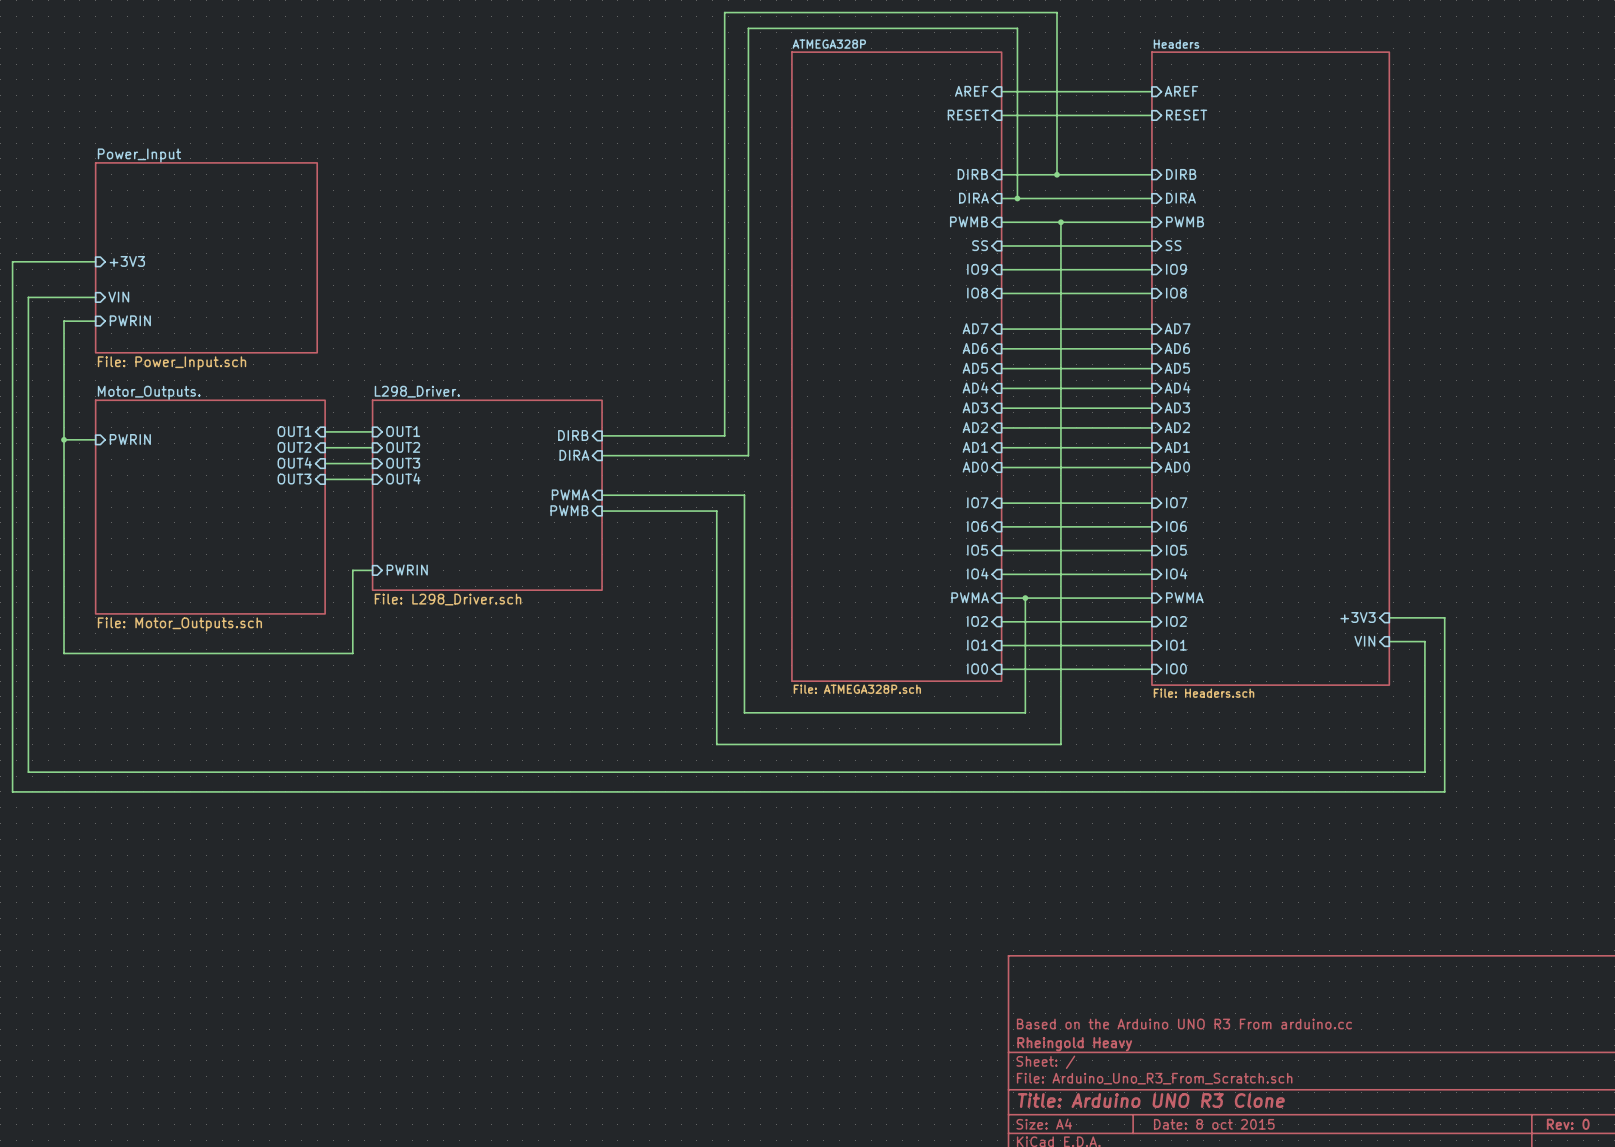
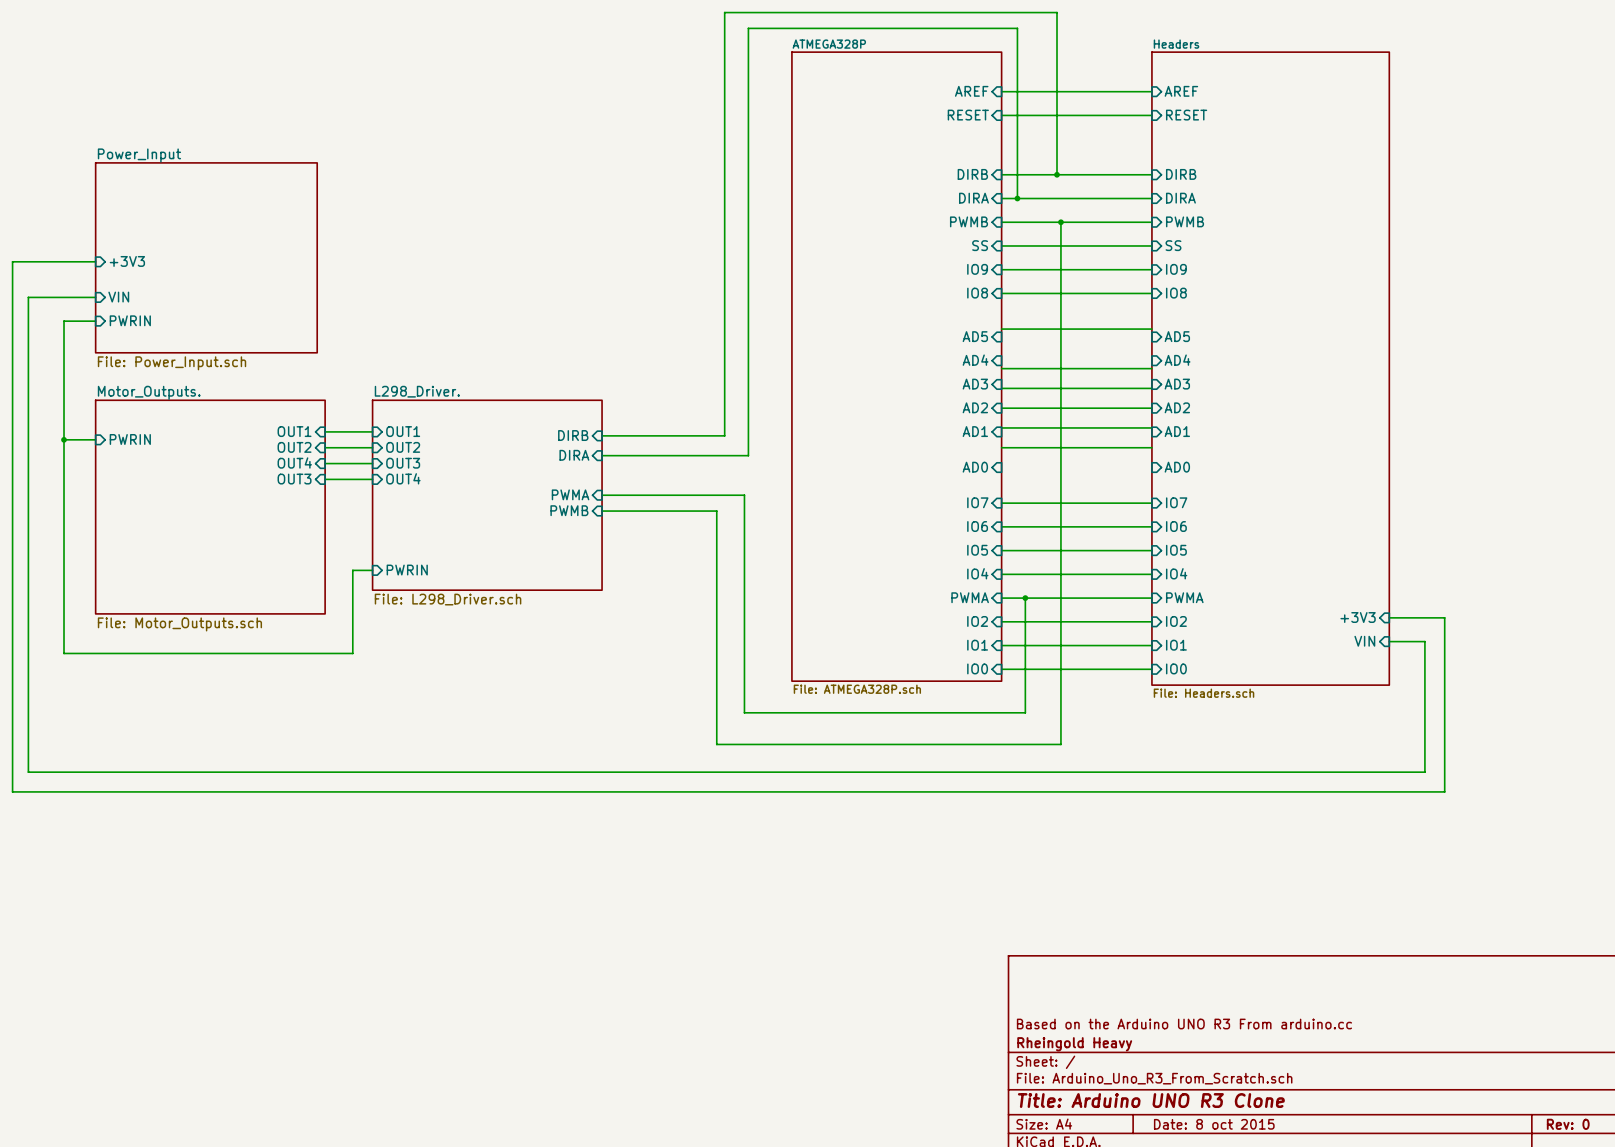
sheet pin: AD7 (975, 328) -> none
sheet pin: AD7 (1177, 328) -> none
sheet pin: AD6 (975, 348) -> none
wire: (1001, 348) (1151, 348) -> none
sheet pin: AD6 (1177, 348) -> none
sheet pin position: AD5 (975, 368) -> AD5 (975, 336)
sheet pin position: AD5 (1177, 368) -> AD5 (1177, 336)
sheet pin: none -> AD3 (975, 384)
sheet pin: none -> AD3 (1177, 384)
sheet pin position: AD4 (975, 387) -> AD4 (975, 360)
sheet pin position: AD4 (1177, 387) -> AD4 (1177, 360)
sheet pin: AD3 (975, 407) -> AD2 (975, 407)
sheet pin: AD3 (1177, 407) -> AD2 (1177, 407)
sheet pin: AD2 (975, 427) -> none
sheet pin: AD2 (1177, 427) -> none
sheet pin position: AD1 (975, 447) -> AD1 (975, 431)
sheet pin position: AD1 (1177, 447) -> AD1 (1177, 431)
wire: (1001, 467) (1151, 467) -> none

